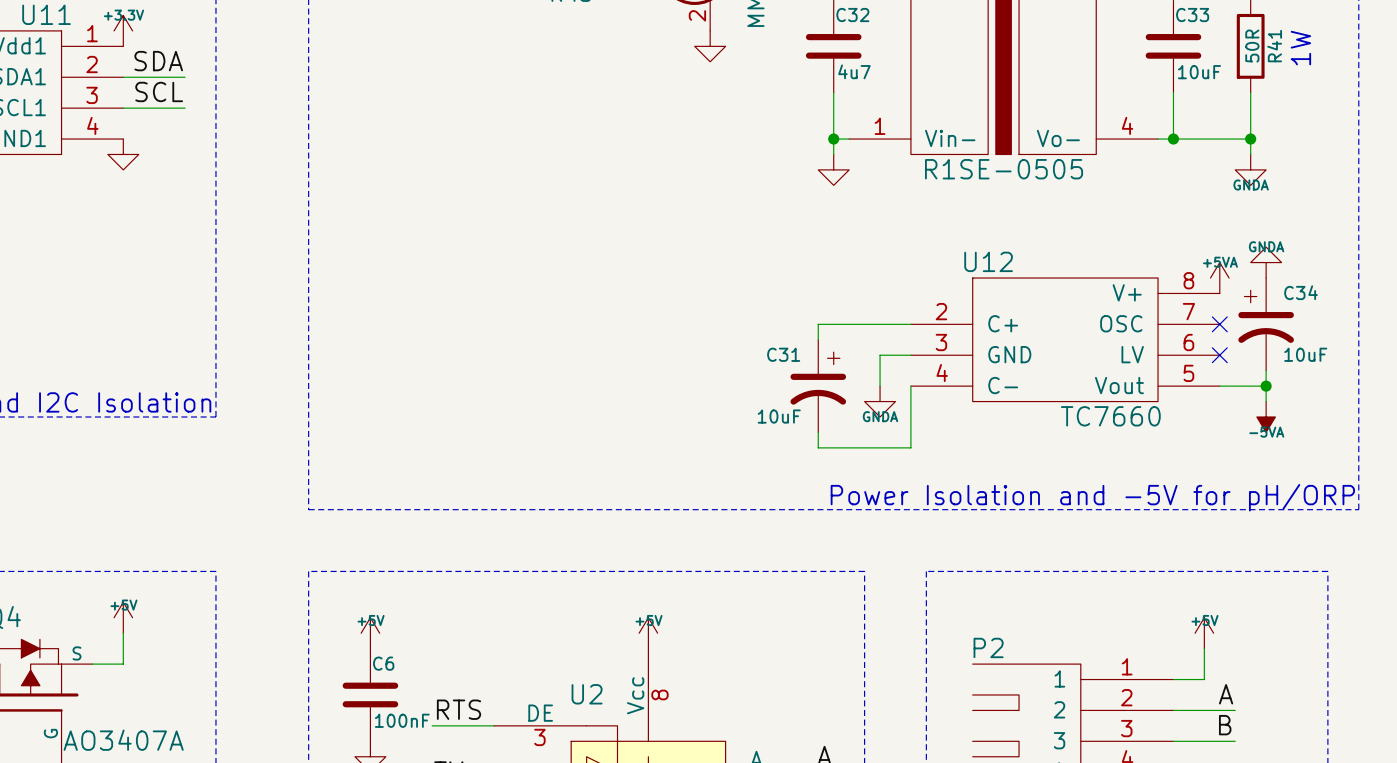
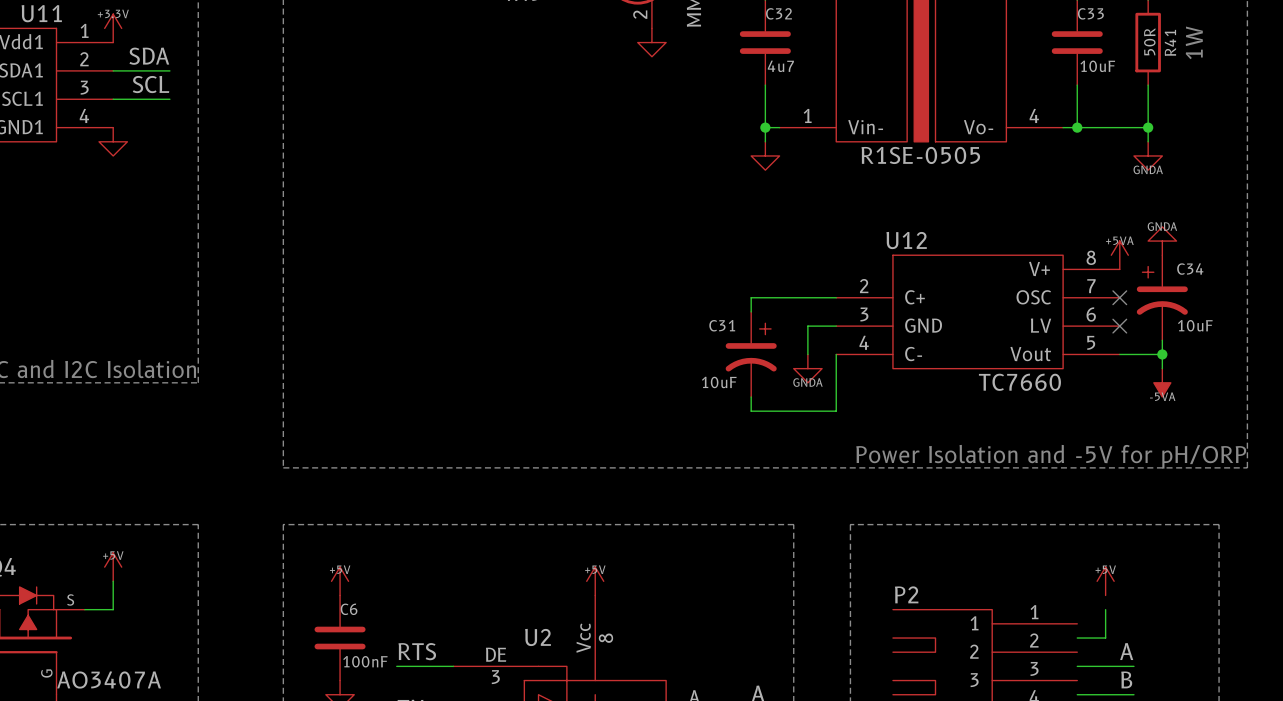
wire: (1204, 648) (1204, 664) -> none
wire: (1173, 679) (1204, 679) -> (1077, 638) (1105, 638) (1105, 623)
label position: A (1226, 694) -> A (1126, 651)
wire: (1173, 710) (1235, 710) -> (1077, 666) (1133, 666)
label position: B (1225, 725) -> B (1126, 679)
wire: (1173, 741) (1235, 741) -> (1077, 694) (1133, 694)

